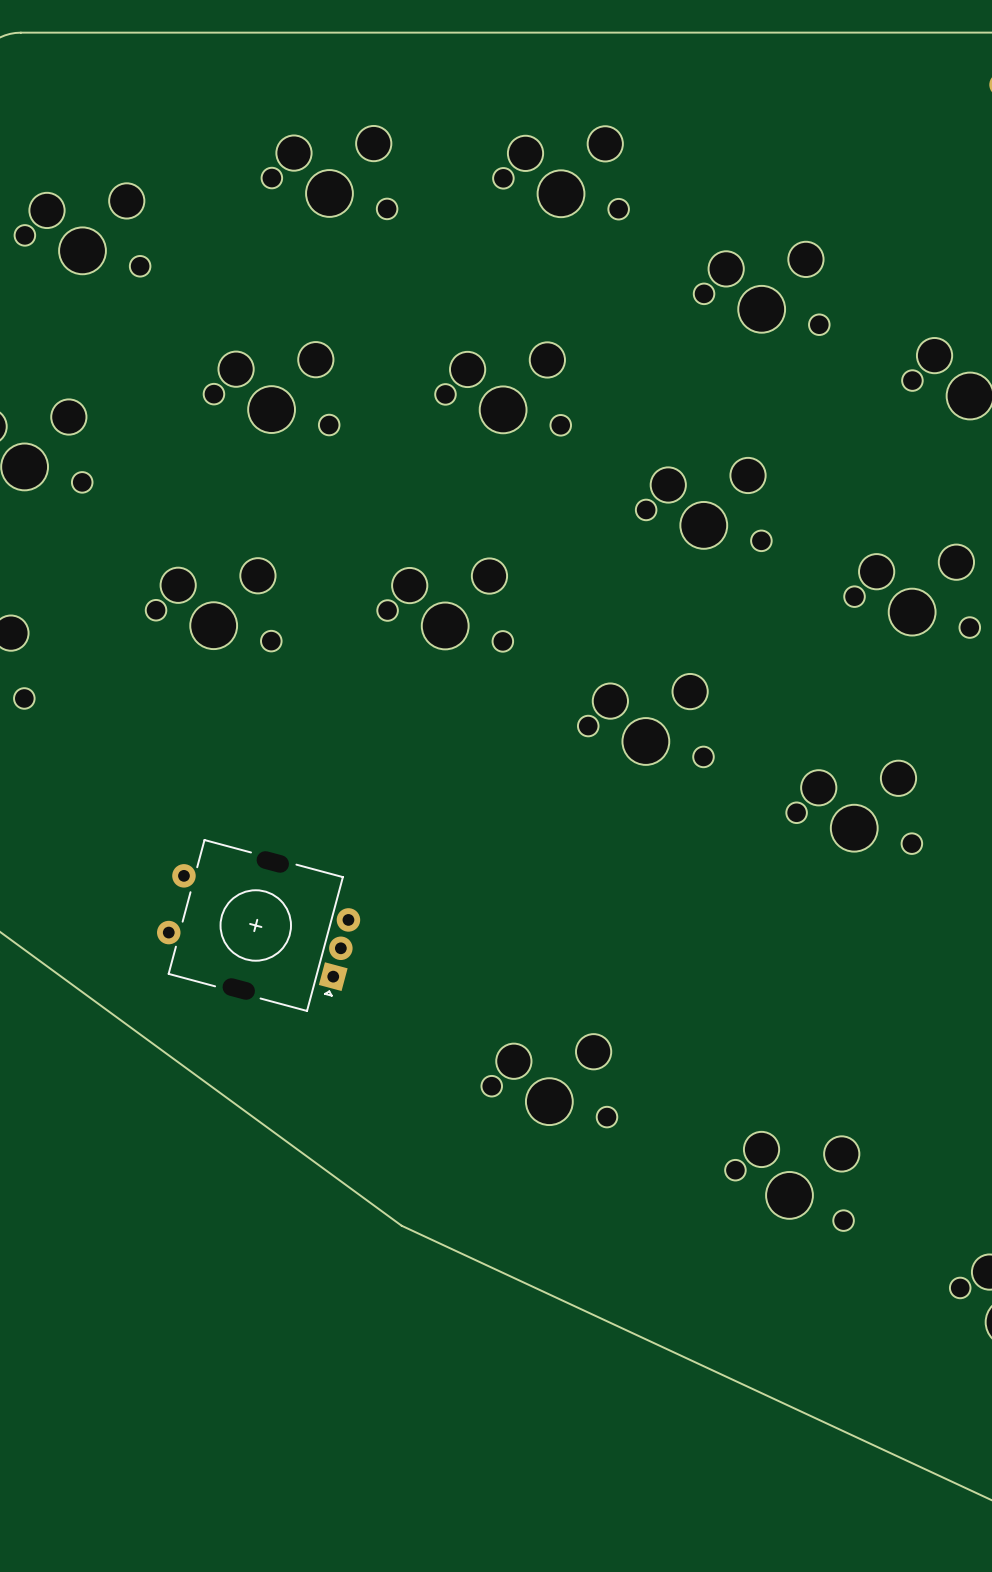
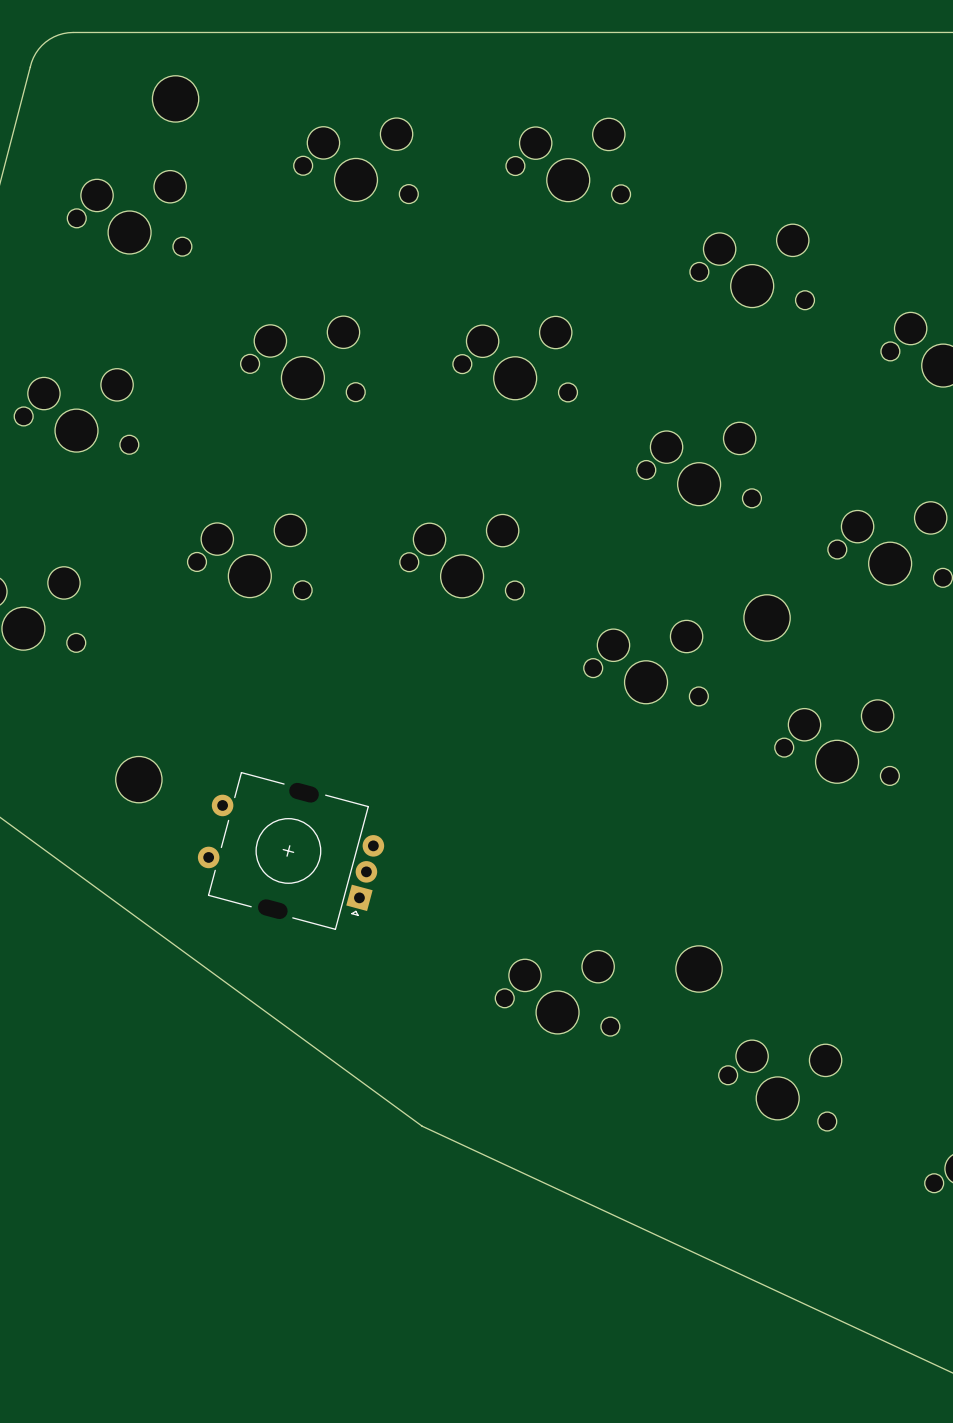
part: none -> (175, 98)
part: none -> (767, 617)
part: none -> (138, 779)
part: none -> (699, 969)

